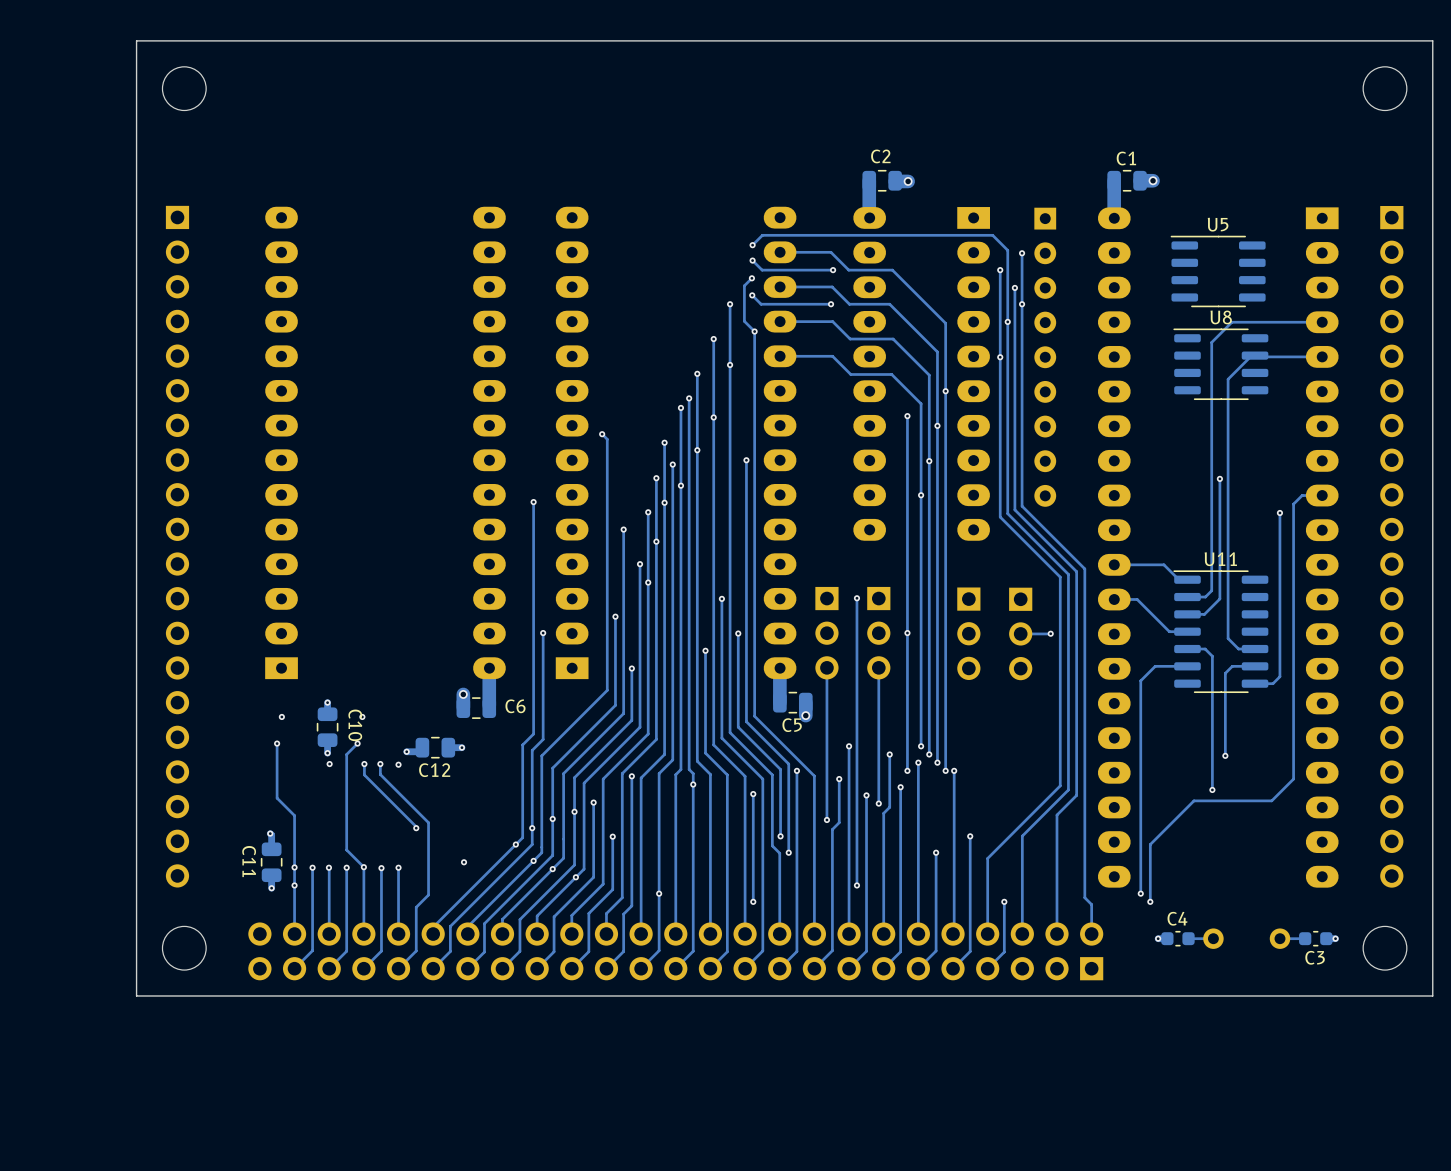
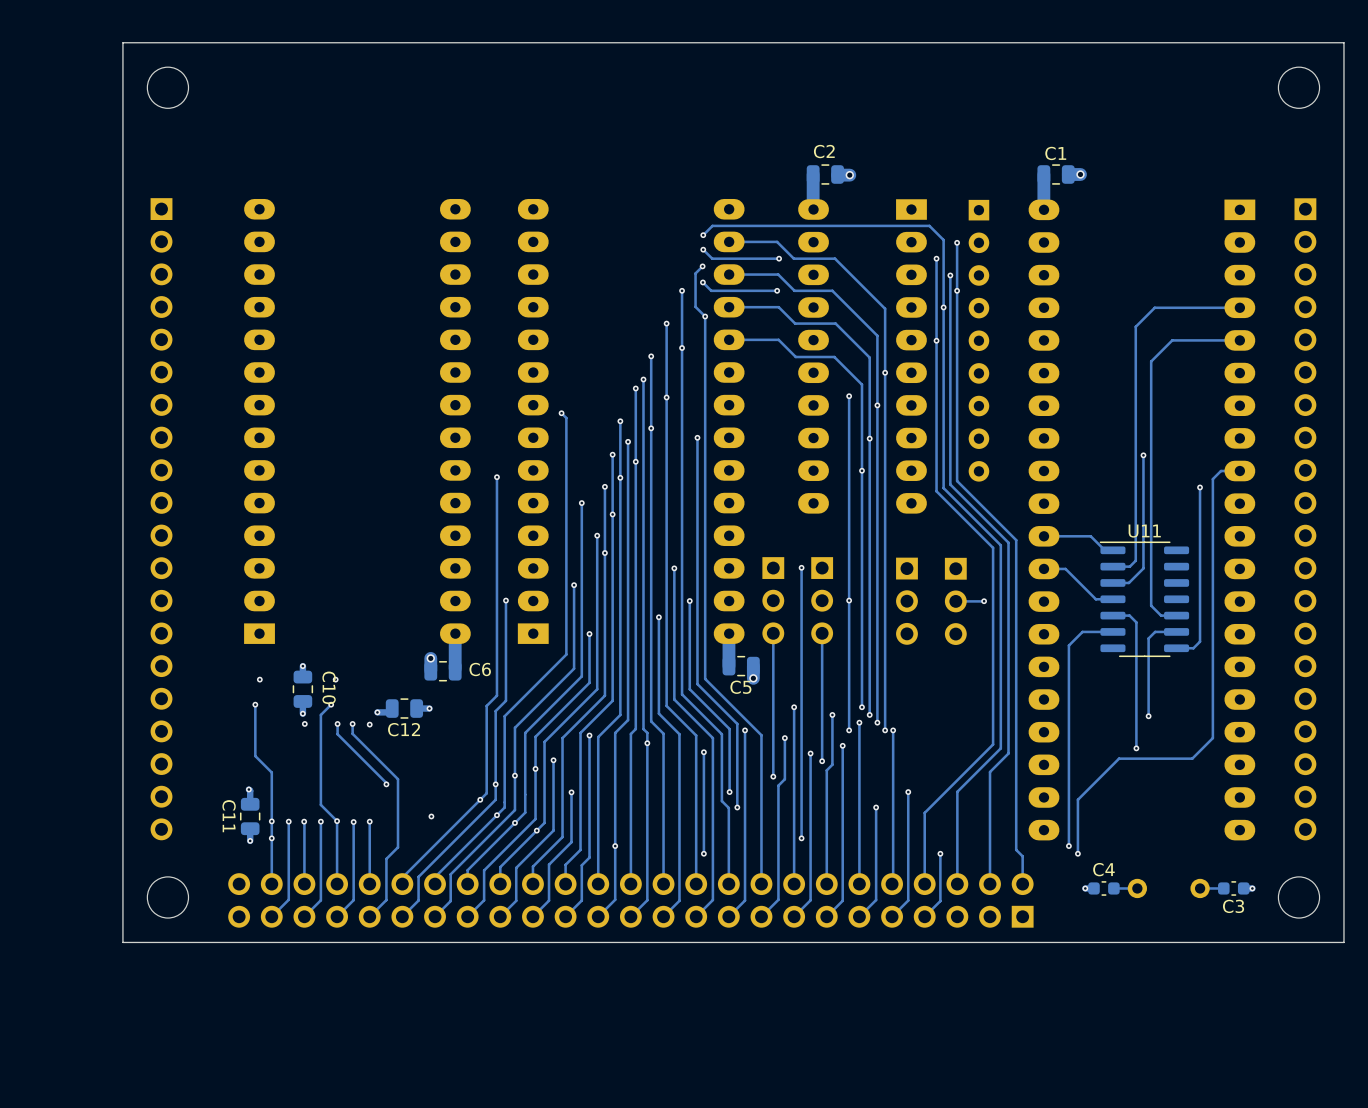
U5: (1218, 271) -> none
U8: (1220, 364) -> none

